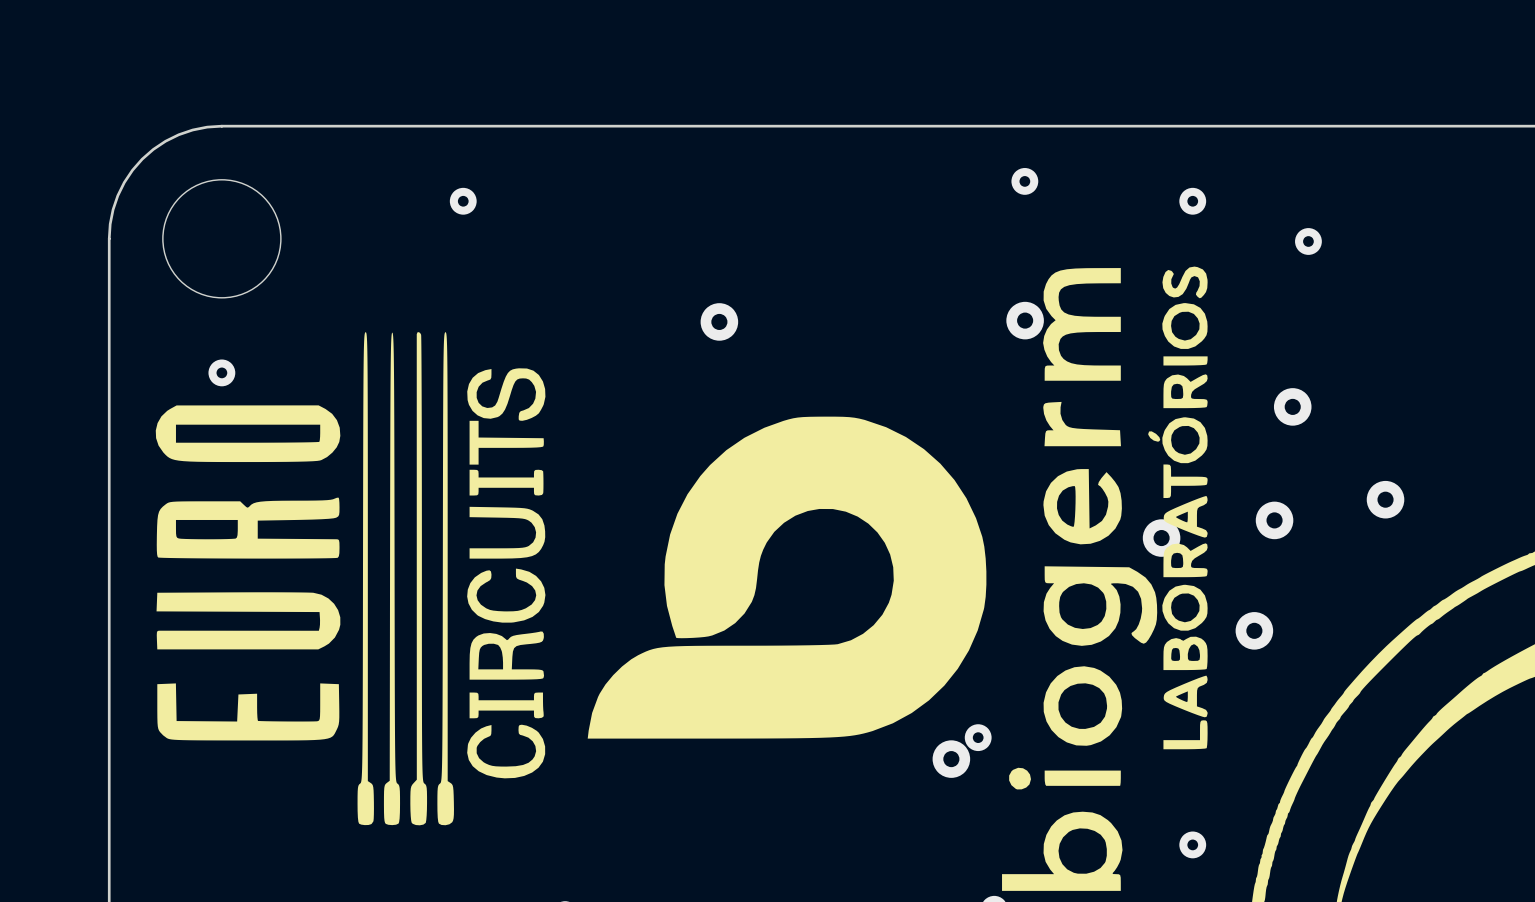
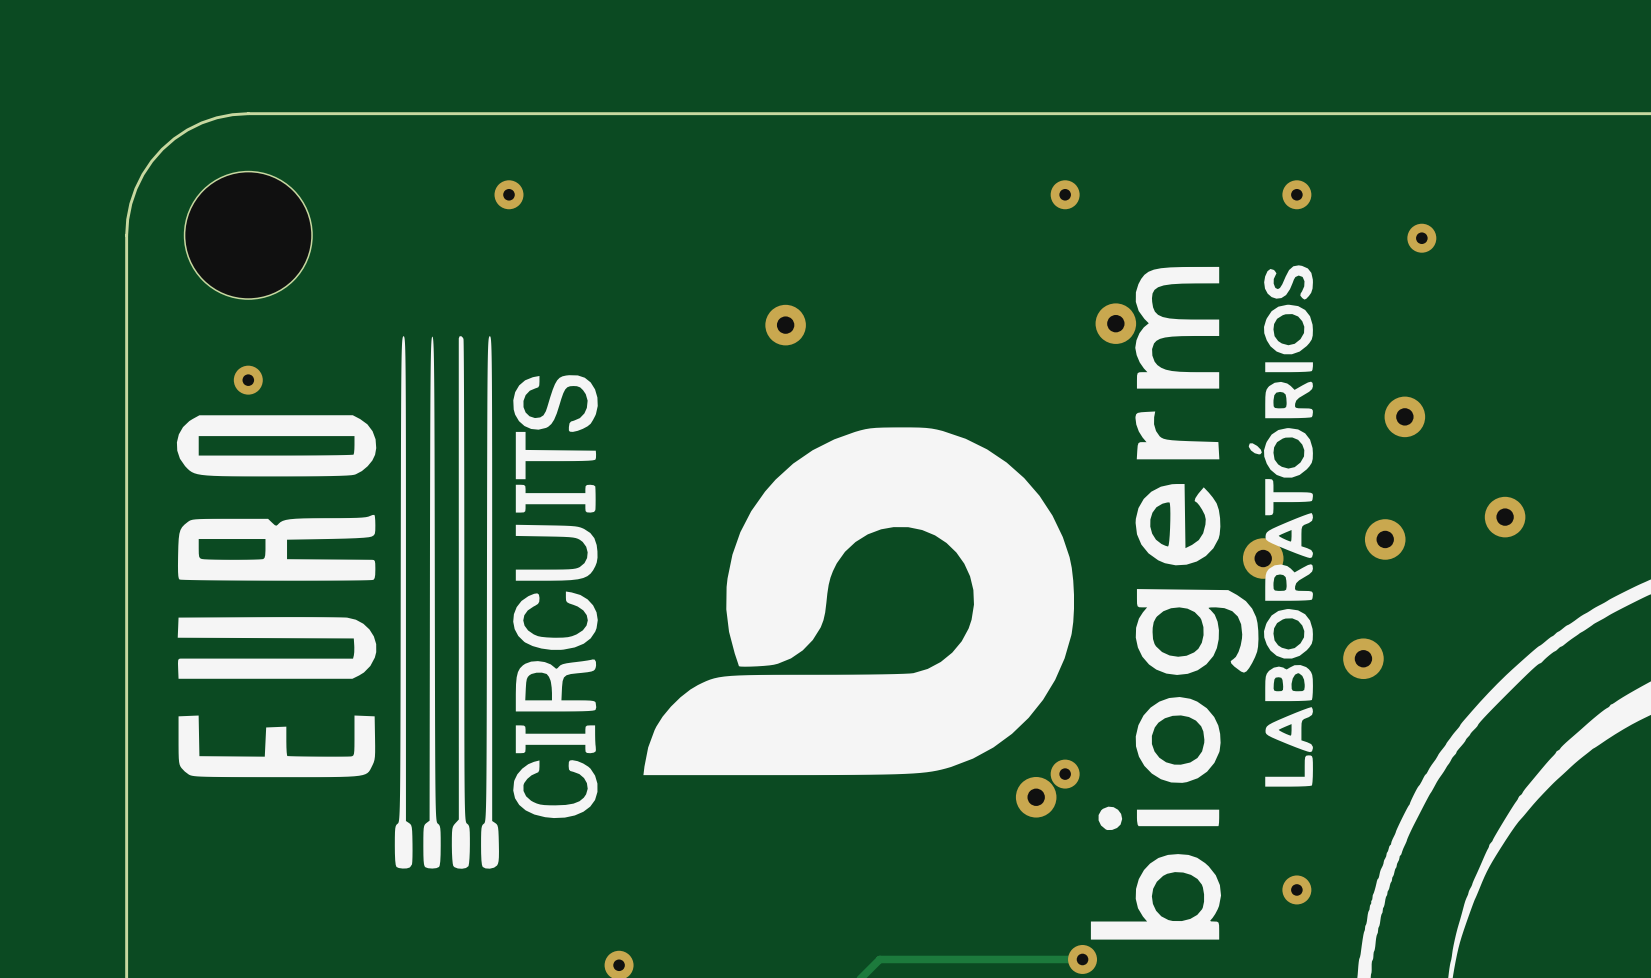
via position: (1024, 181) -> (1065, 194)

